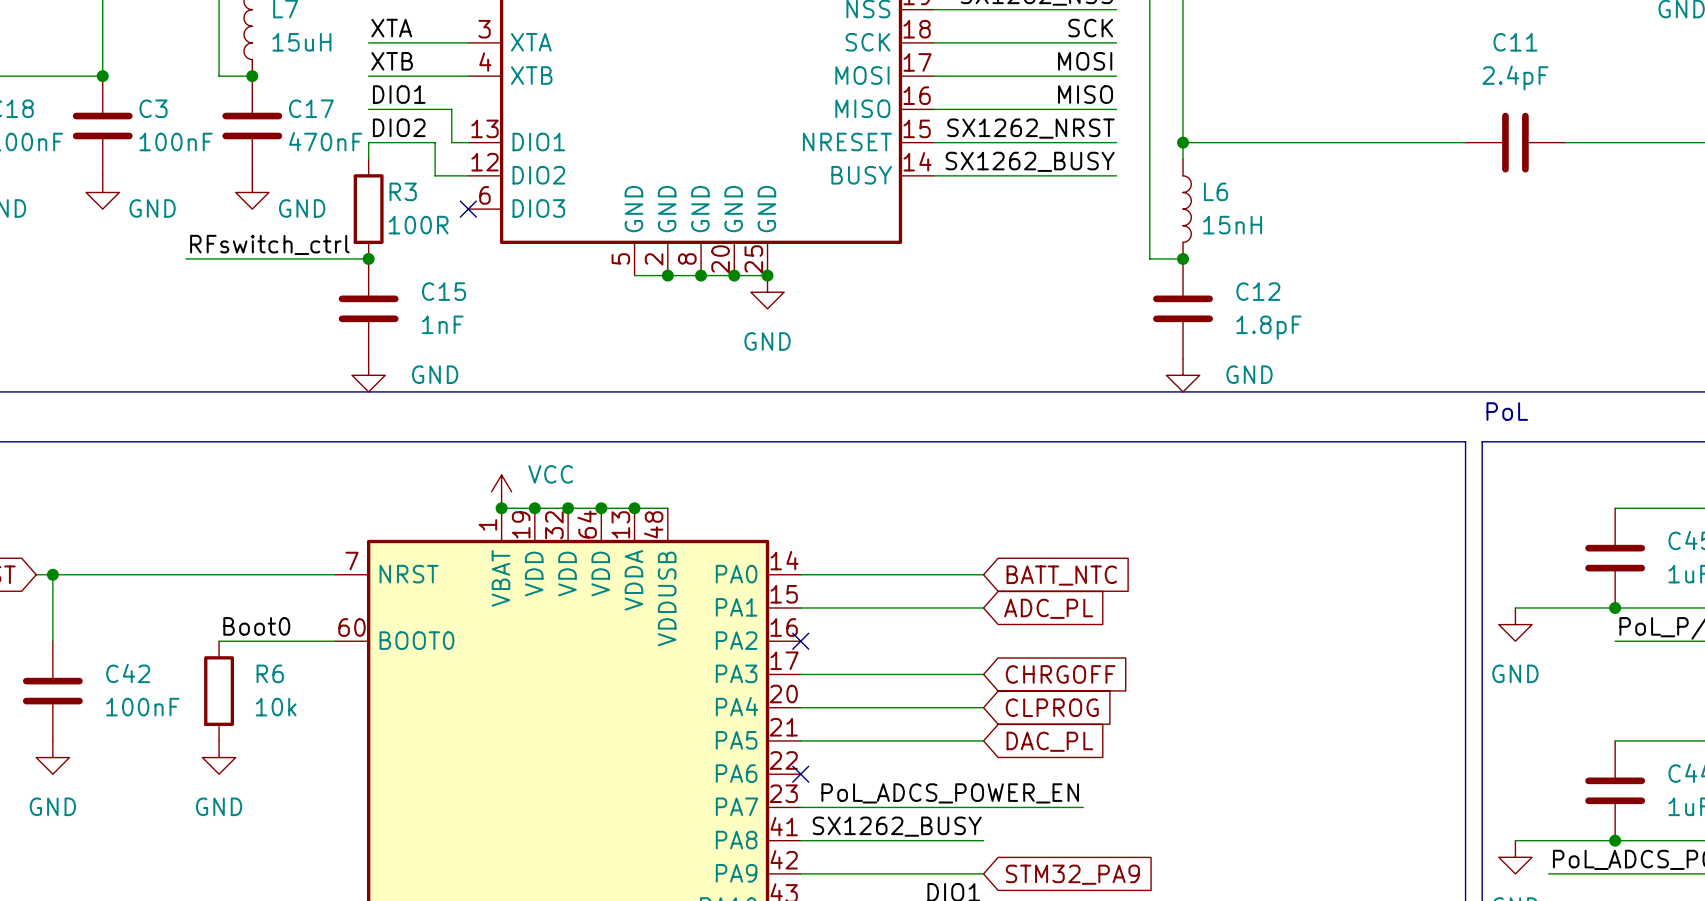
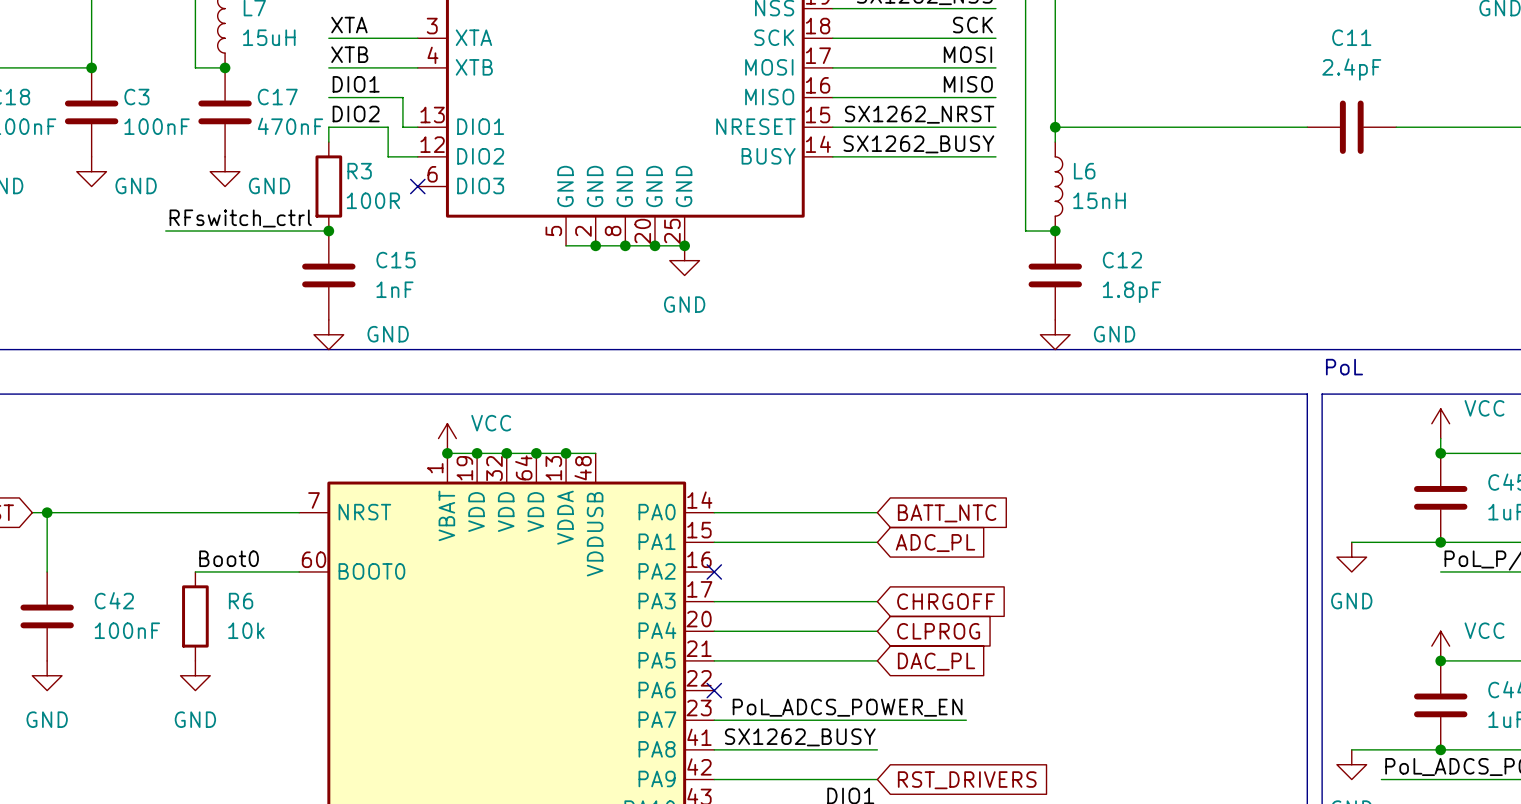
power symbol: none -> VCC (1440, 423)
wire: none -> (1440, 438) (1440, 453)
junction: none -> (1440, 453)
power symbol: none -> VCC (1440, 646)
junction: none -> (1440, 660)
global label: STM32_PA9 (1072, 874) -> RST_DRIVERS (967, 780)

